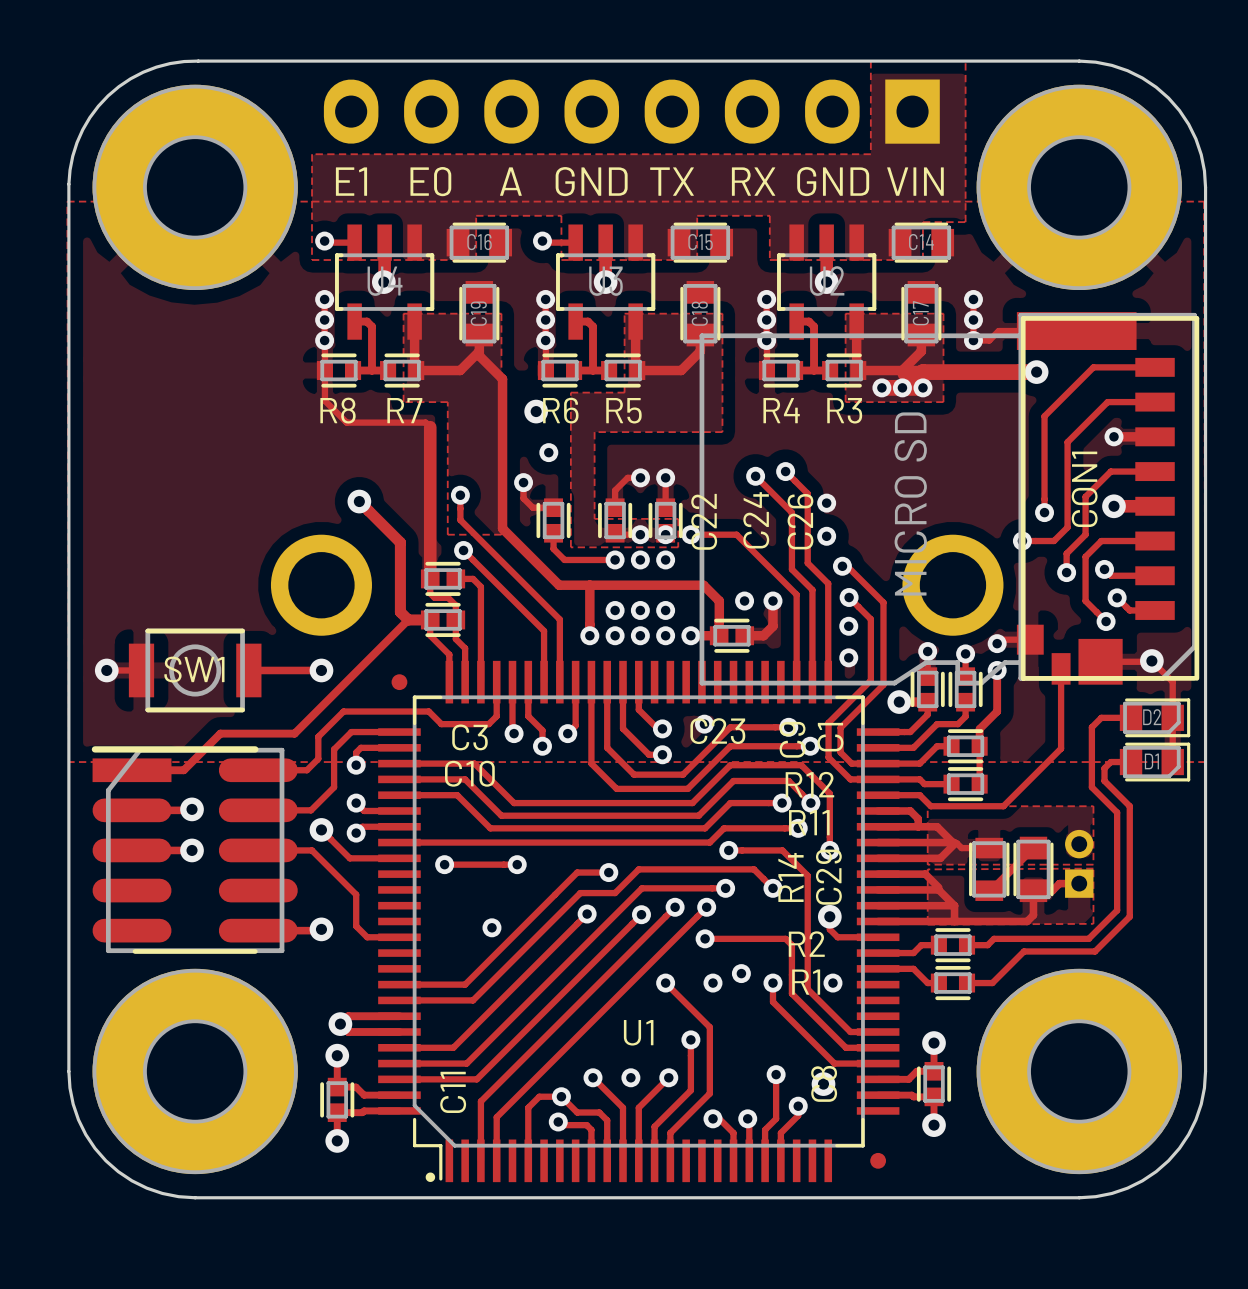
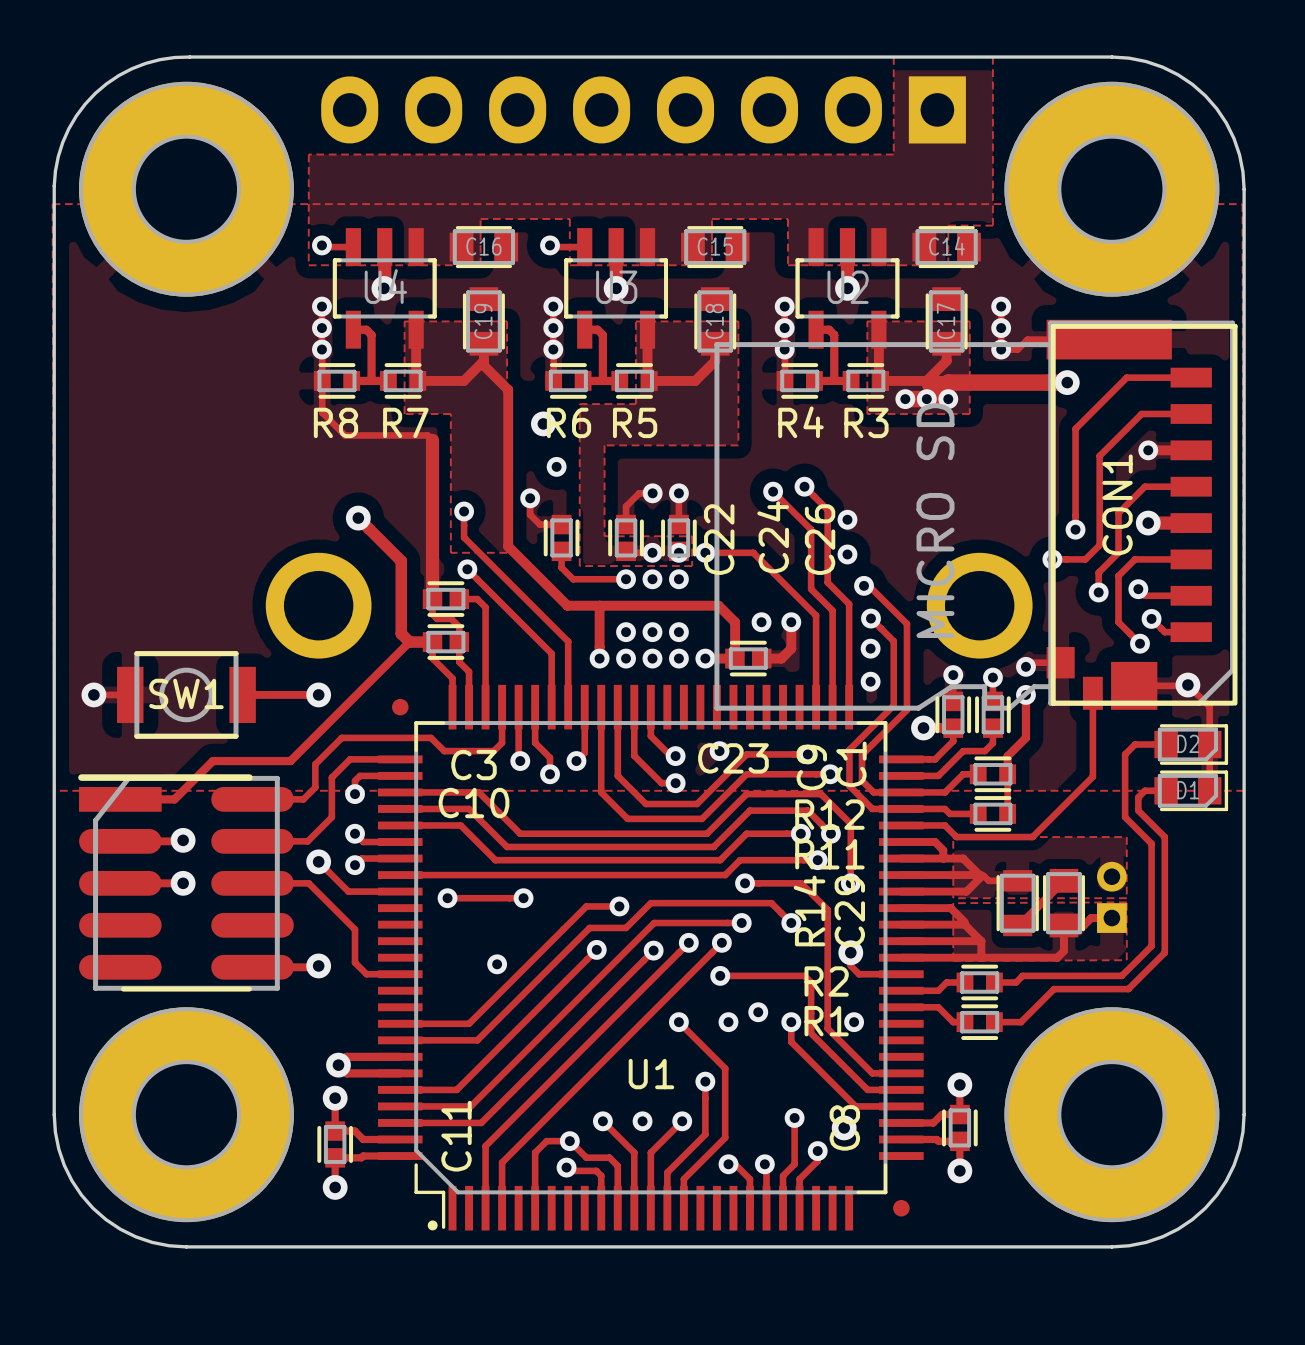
text: E1 (351, 181) -> none
text: E0 (430, 181) -> none
text: A (510, 181) -> none
text: GND (591, 181) -> none
text: TX (672, 181) -> none
text: RX (753, 181) -> none
text: GND (833, 181) -> none
text: VIN (915, 181) -> none

